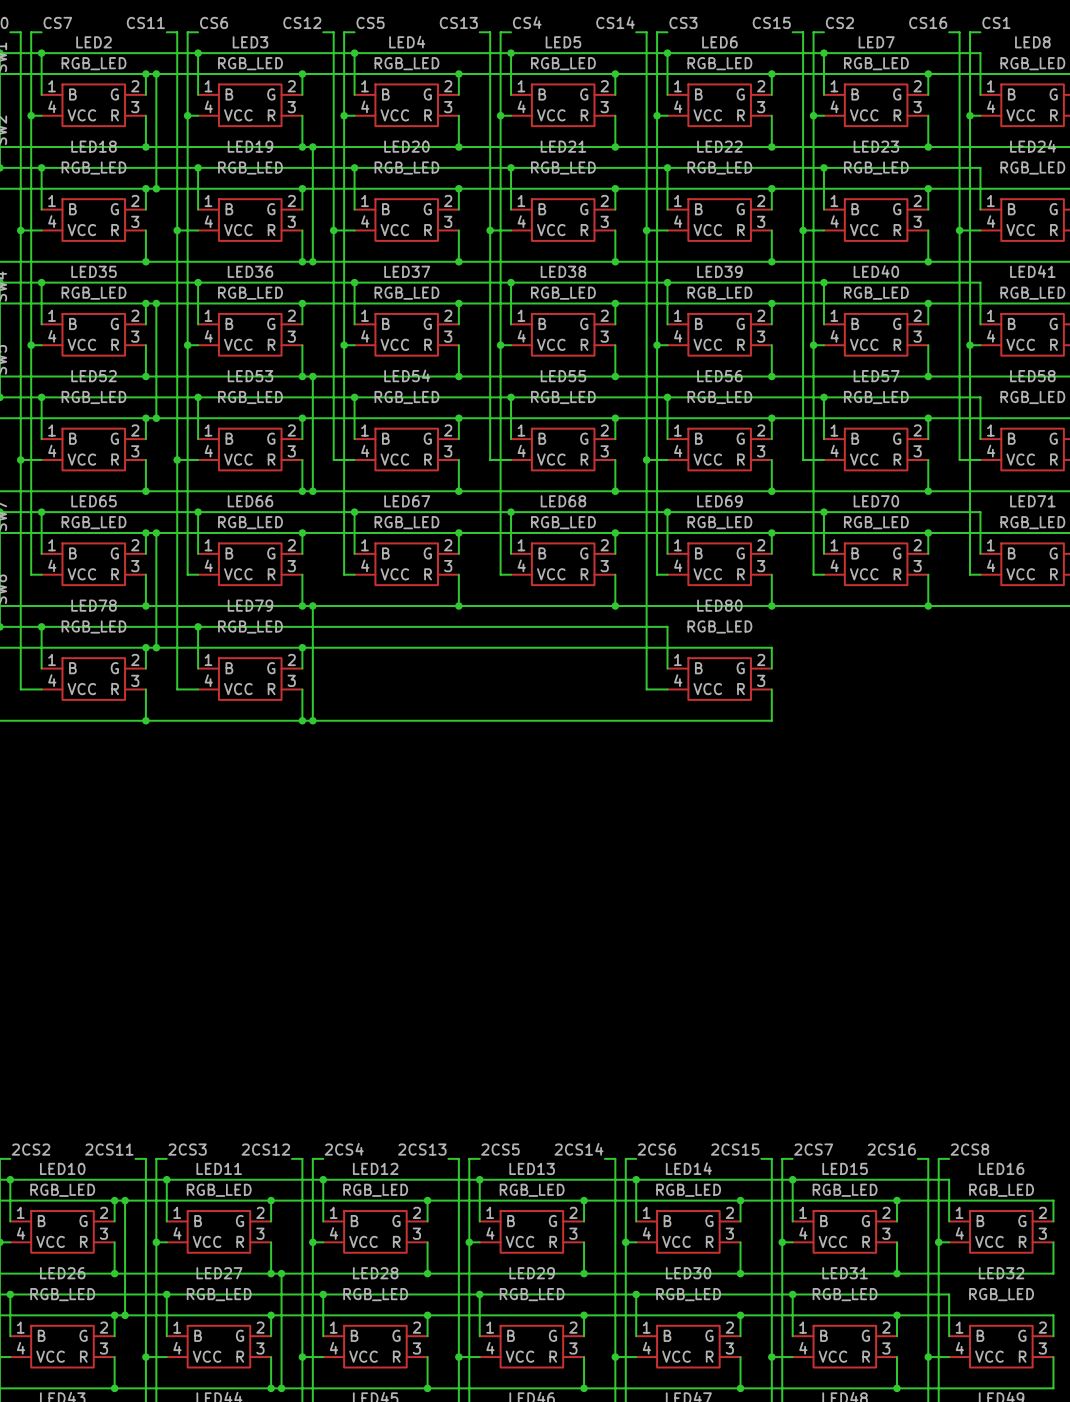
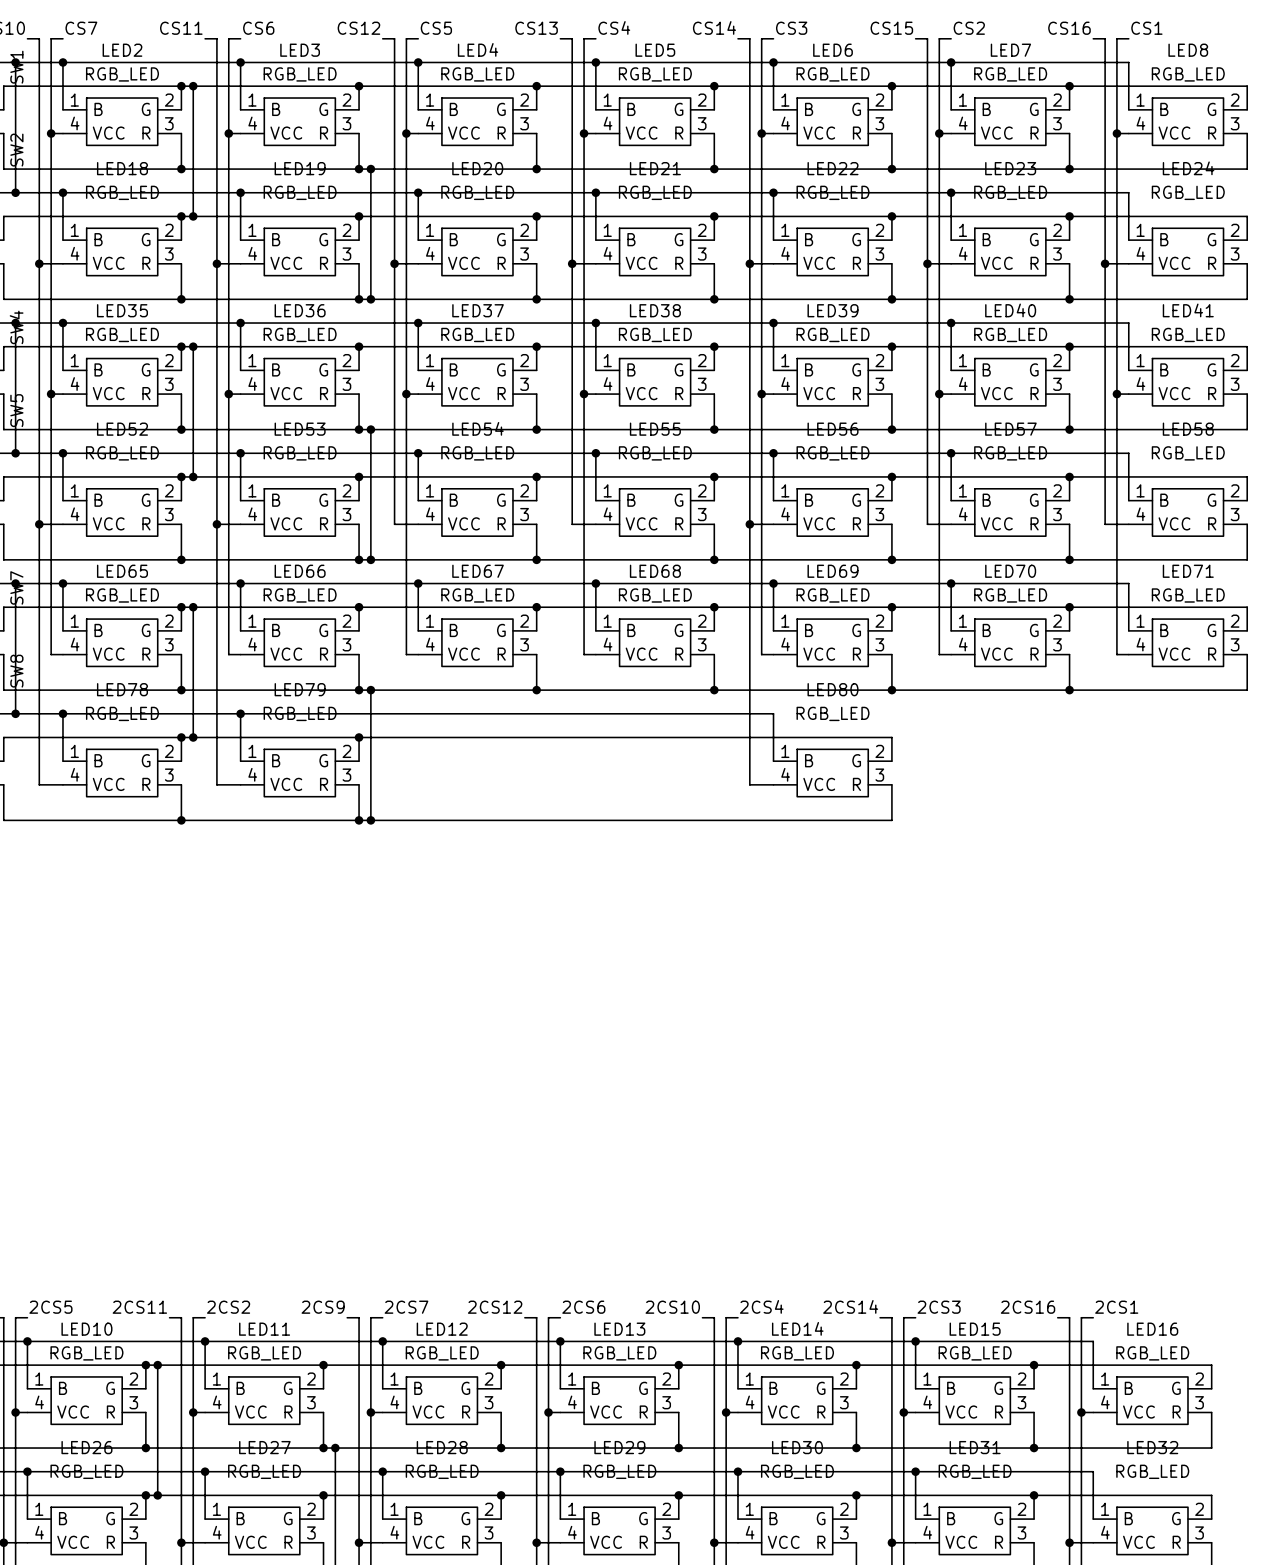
label: 2CS2 (31, 1149) -> 2CS5 (50, 1307)
label: 2CS3 (187, 1149) -> 2CS2 (228, 1307)
label: 2CS12 (265, 1149) -> 2CS9 (323, 1307)
label: 2CS4 (344, 1149) -> 2CS7 (406, 1307)
label: 2CS13 (422, 1149) -> 2CS12 (495, 1307)
label: 2CS5 (500, 1149) -> 2CS6 (583, 1307)
label: 2CS14 (579, 1149) -> 2CS10 (672, 1307)
label: 2CS6 (656, 1149) -> 2CS4 (761, 1306)
label: 2CS15 (735, 1149) -> 2CS14 (850, 1306)
label: 2CS7 (813, 1149) -> 2CS3 (939, 1307)
label: 2CS8 (969, 1149) -> 2CS1 (1116, 1307)

